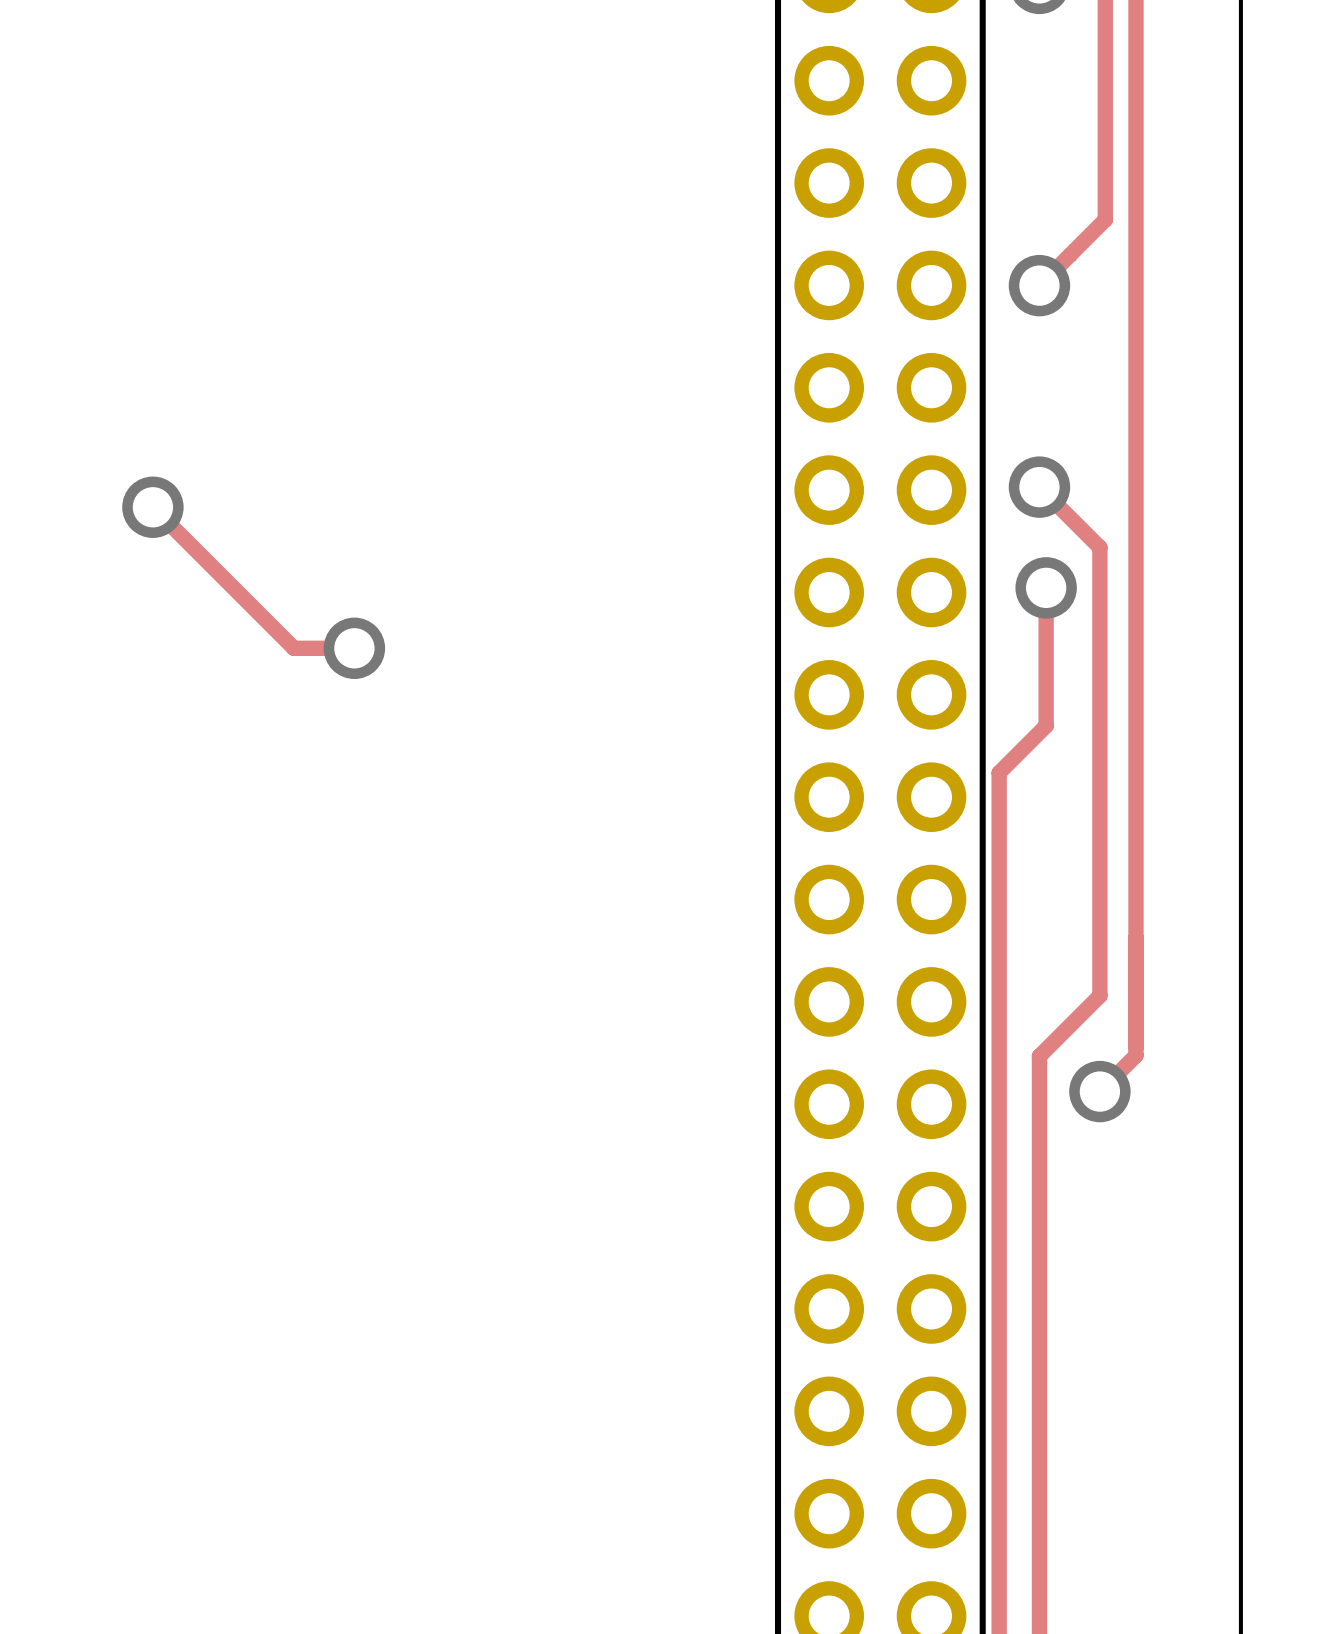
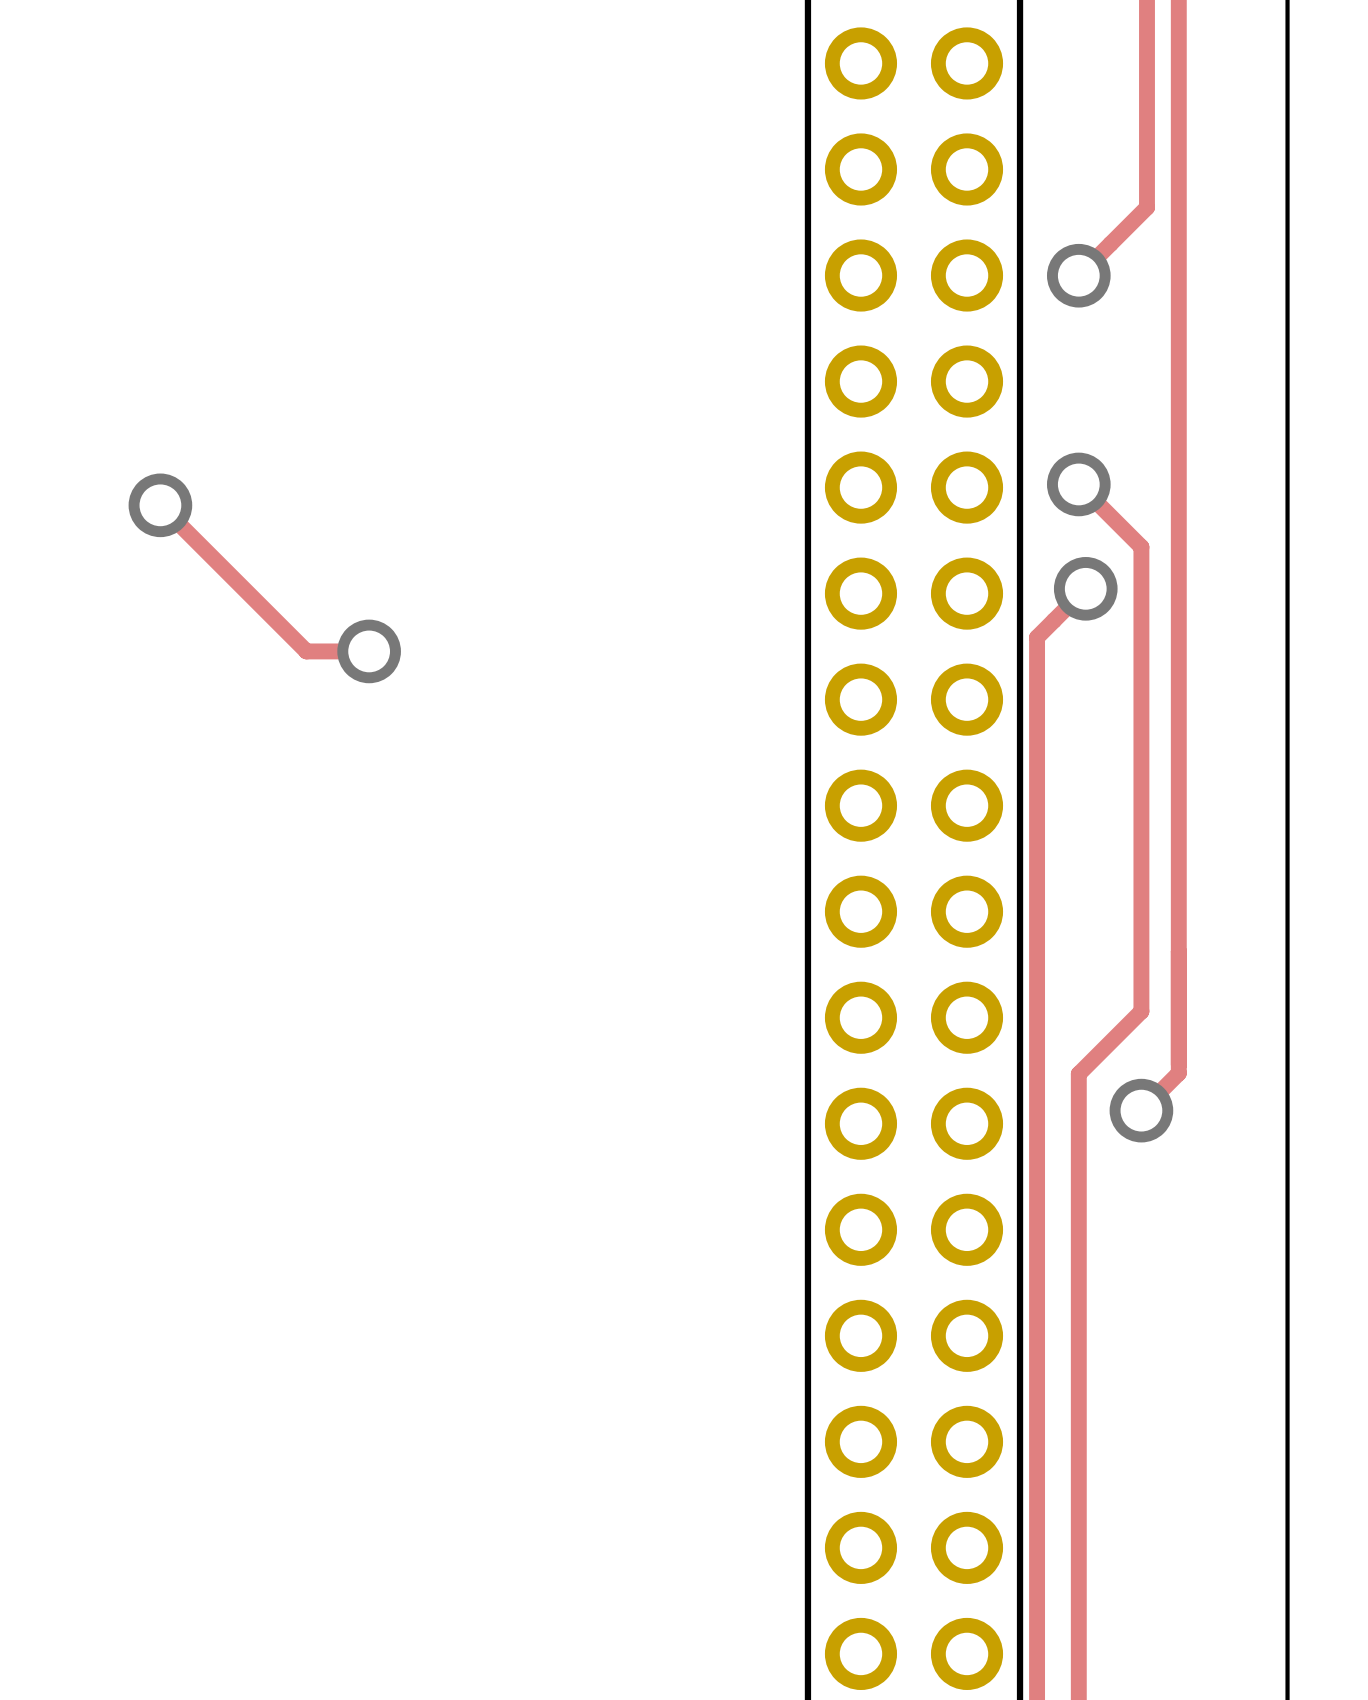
track: (1046, 587) (1046, 725) (999, 772) -> (1085, 588) (1037, 637) (1037, 780)

